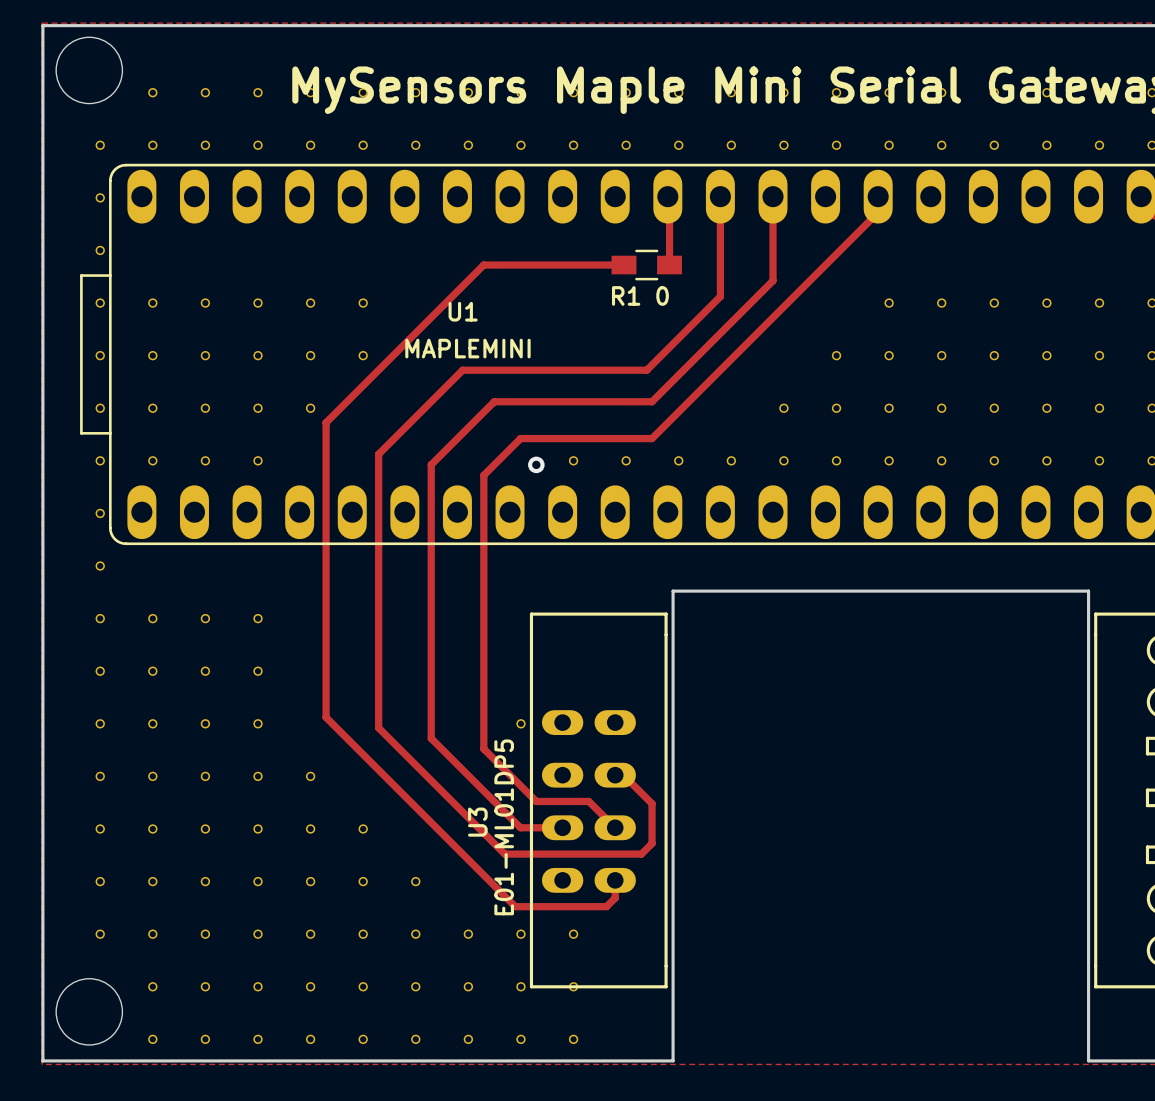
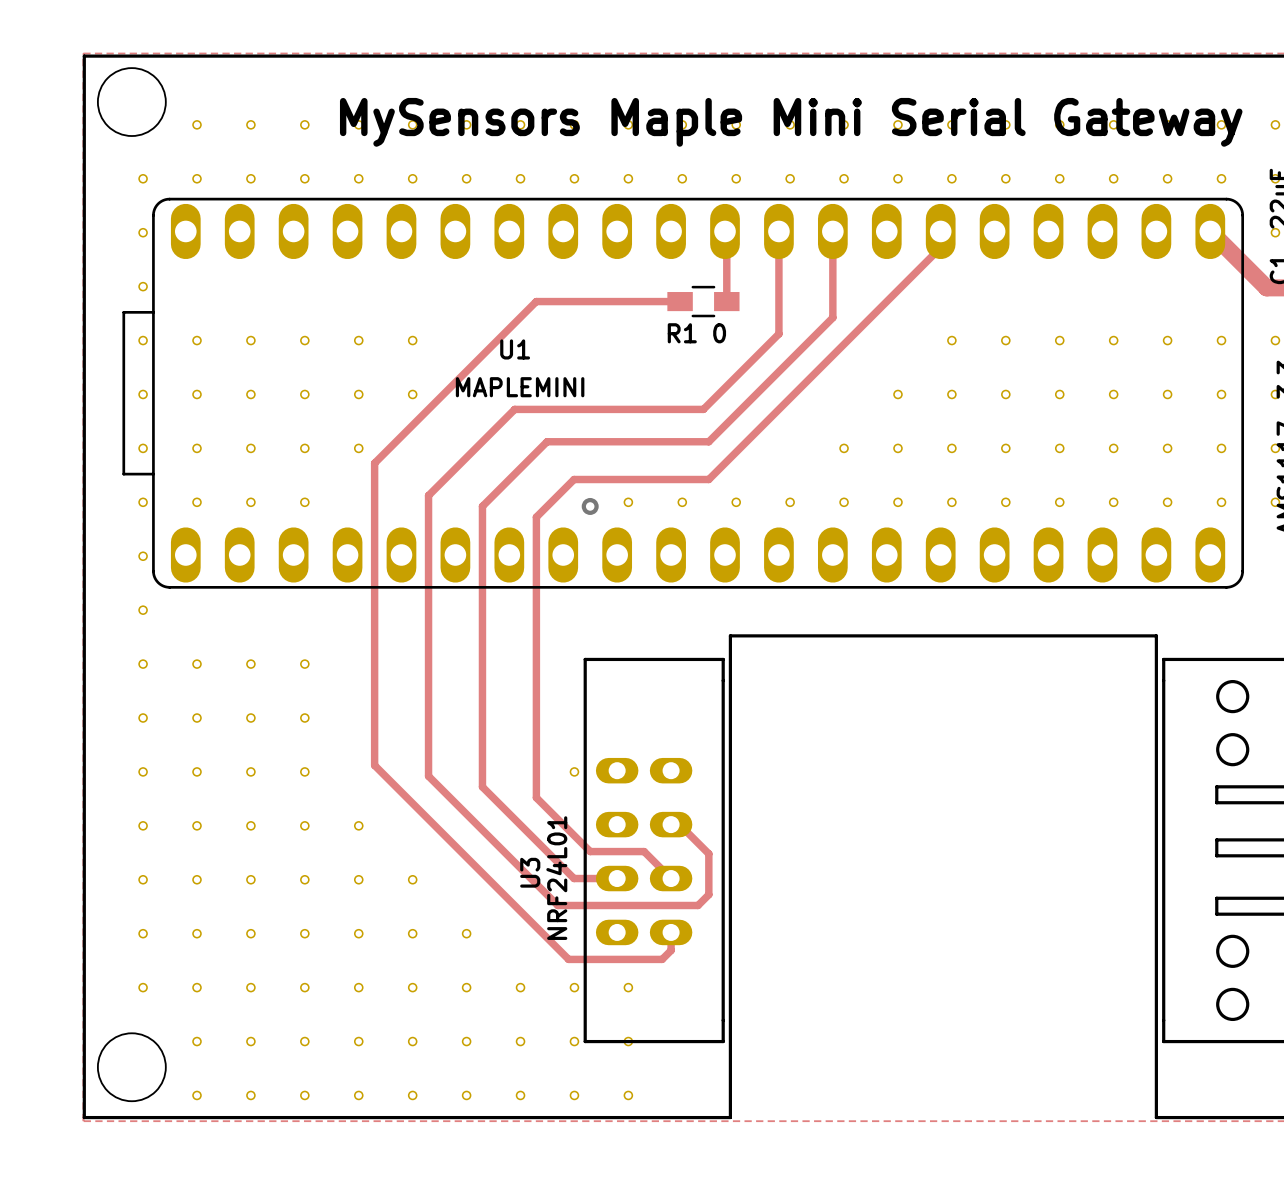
U3 value: E01-ML01DP5 (504, 827) -> NRF24L01 (556, 878)

